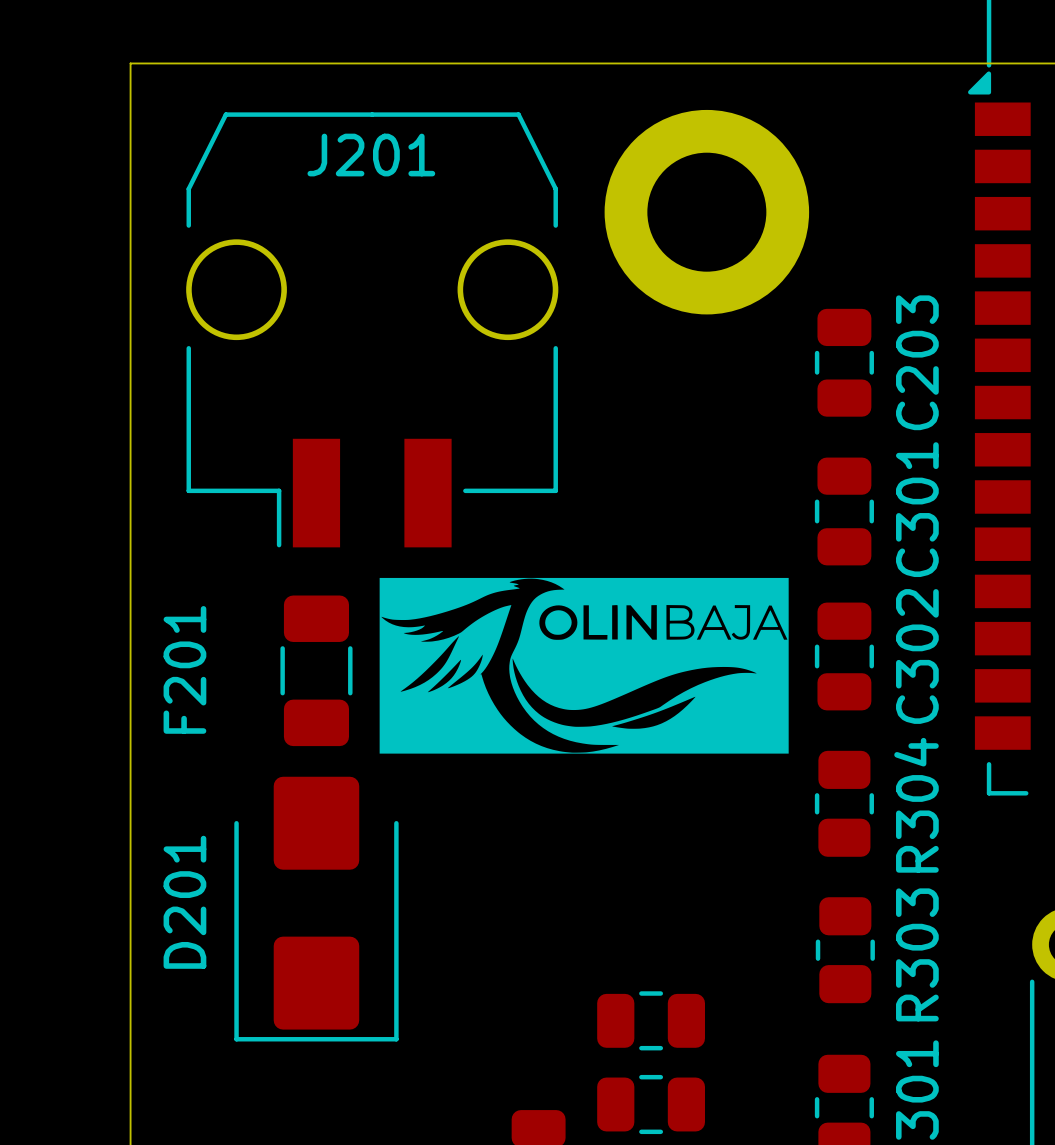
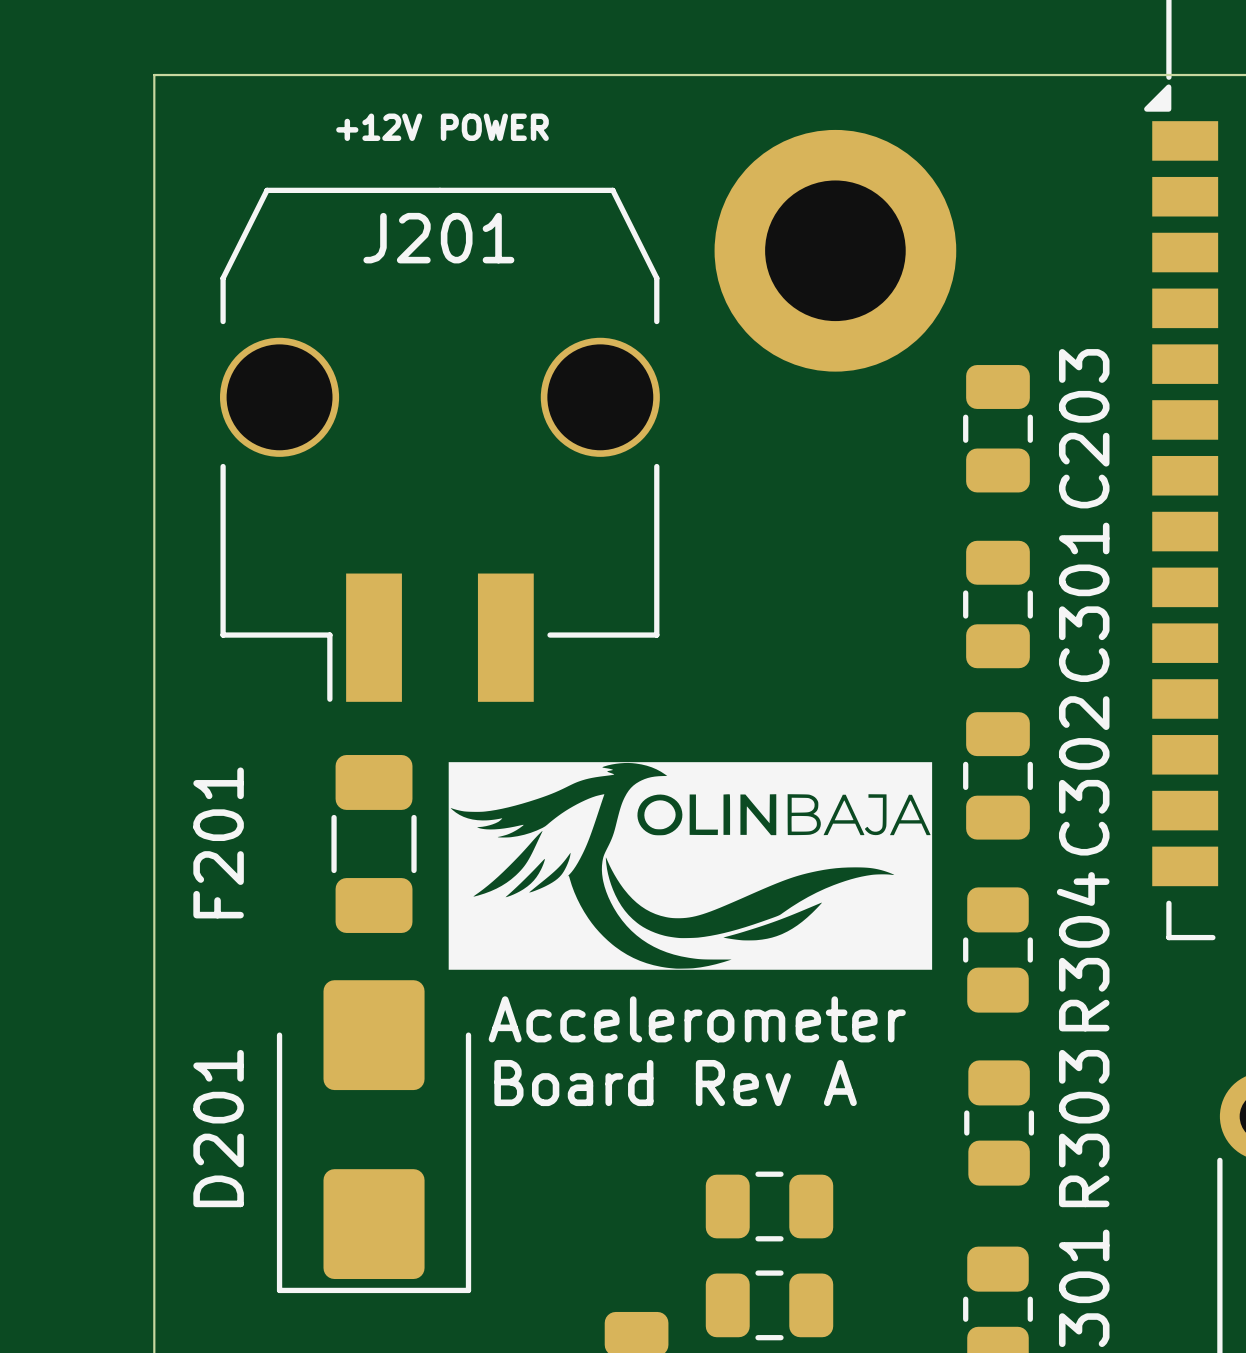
text: none -> +12V POWER (442, 127)
J201 position: (372, 329) -> (439, 444)
drawing position: (584, 665) -> (690, 865)
F201 position: (316, 670) -> (374, 843)
text: none -> Accelerometer (697, 1019)
D201 position: (316, 909) -> (374, 1136)
text: none -> Board Rev A (675, 1083)

